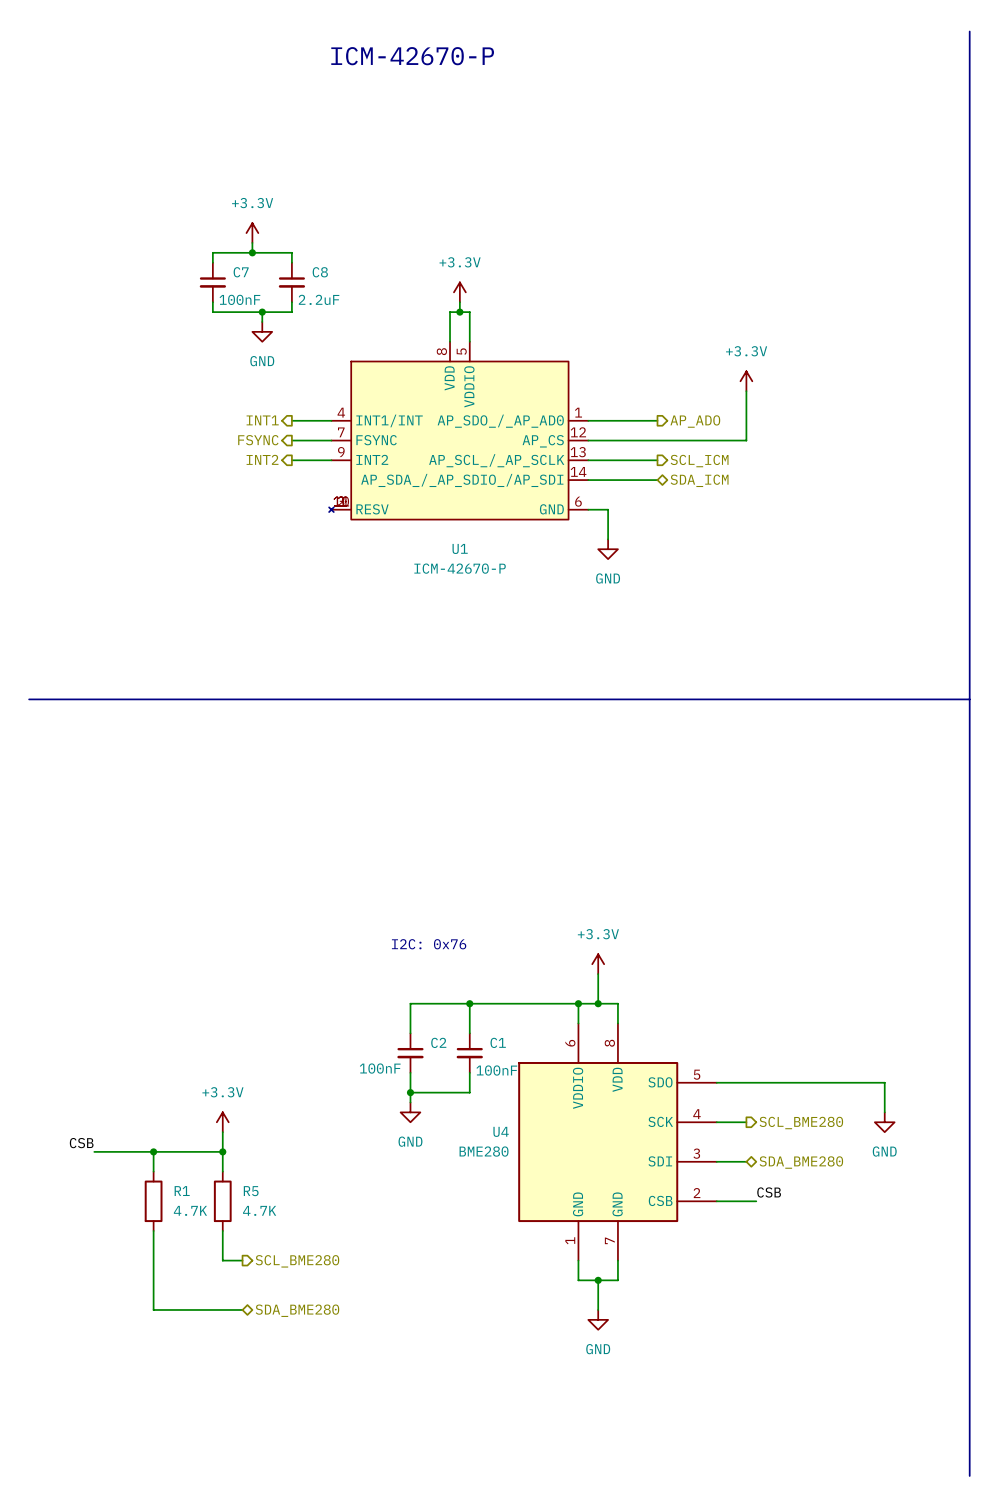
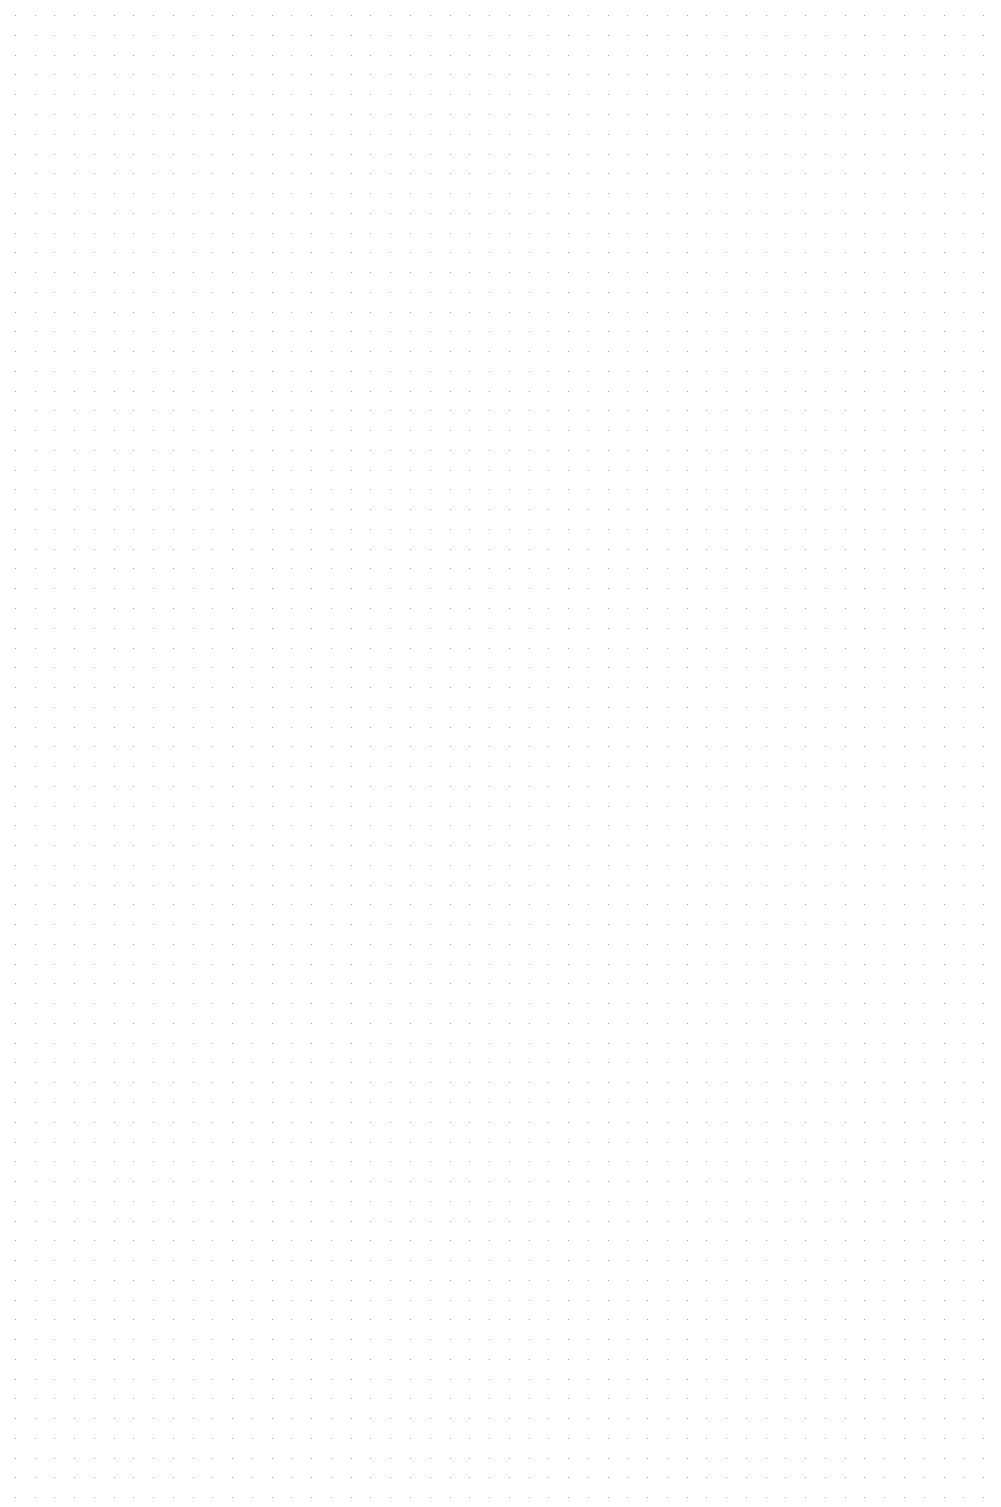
line: (969, 31) (969, 1475) -> none
text: ICM-42670-P (412, 56) -> none
power symbol: +3.3V (252, 233) -> none
wire: (252, 242) (252, 252) -> none
junction: (252, 252) -> none
wire: (212, 262) (212, 252) (291, 252) (291, 262) -> none
C7: 100nF (212, 282) -> none
C8: 2.2uF (291, 282) -> none
power symbol: +3.3V (459, 292) -> none
wire: (212, 302) (212, 312) (291, 312) (291, 302) -> none
wire: (459, 302) (459, 312) -> none
wire: (262, 312) (262, 321) -> none
junction: (262, 312) -> none
junction: (459, 312) -> none
power symbol: GND (262, 331) -> none
wire: (450, 341) (450, 312) (469, 312) (469, 341) -> none
power symbol: +3.3V (746, 381) -> none
wire: (746, 391) (746, 440) (588, 440) -> none
hierarchical label: INT1 (262, 420) -> none
wire: (291, 420) (331, 420) -> none
wire: (588, 420) (657, 420) -> none
hierarchical label: AP_ADO (695, 421) -> none
U1: ICM-42670-P (458, 430) -> none
hierarchical label: FSYNC (258, 440) -> none
wire: (291, 440) (331, 440) -> none
hierarchical label: INT2 (262, 459) -> none
wire: (291, 460) (331, 460) -> none
wire: (588, 460) (657, 460) -> none
hierarchical label: SCL_ICM (699, 461) -> none
wire: (588, 480) (657, 480) -> none
hierarchical label: SDA_ICM (699, 480) -> none
wire: (588, 509) (608, 509) (608, 539) -> none
power symbol: GND (608, 549) -> none
line: (29, 699) (969, 699) -> none
text: I2C: 0x76 (429, 944) -> none
power symbol: +3.3V (598, 964) -> none
wire: (598, 974) (598, 1003) -> none
wire: (469, 1003) (469, 1033) -> none
junction: (469, 1003) -> none
wire: (578, 1003) (578, 1023) -> none
junction: (578, 1003) -> none
junction: (598, 1003) -> none
wire: (617, 1023) (617, 1003) (410, 1003) (410, 1033) -> none
C2: 100nF (410, 1053) -> none
C1: 100nF (469, 1053) -> none
wire: (410, 1072) (410, 1102) -> none
wire: (469, 1072) (469, 1092) (410, 1092) -> none
wire: (716, 1082) (884, 1082) (884, 1112) -> none
junction: (410, 1092) -> none
power symbol: GND (410, 1112) -> none
power symbol: +3.3V (222, 1122) -> none
wire: (716, 1122) (746, 1122) -> none
power symbol: GND (884, 1122) -> none
hierarchical label: SCL_BME280 (801, 1123) -> none
wire: (222, 1132) (222, 1171) -> none
U4: BME280 (617, 1142) -> none
label: CSB (81, 1143) -> none
wire: (94, 1151) (222, 1151) -> none
wire: (153, 1151) (153, 1171) -> none
junction: (153, 1151) -> none
junction: (222, 1151) -> none
wire: (716, 1161) (746, 1161) -> none
hierarchical label: SDA_BME280 (801, 1162) -> none
label: CSB (769, 1192) -> none
R1: 4.7K (153, 1201) -> none
R5: 4.7K (222, 1201) -> none
wire: (716, 1201) (756, 1201) -> none
wire: (153, 1230) (153, 1309) (242, 1309) -> none
wire: (222, 1230) (222, 1260) (242, 1260) -> none
wire: (578, 1260) (578, 1280) (617, 1280) (617, 1260) -> none
hierarchical label: SCL_BME280 (297, 1261) -> none
wire: (598, 1280) (598, 1309) -> none
junction: (598, 1280) -> none
hierarchical label: SDA_BME280 (297, 1310) -> none
power symbol: GND (598, 1319) -> none

